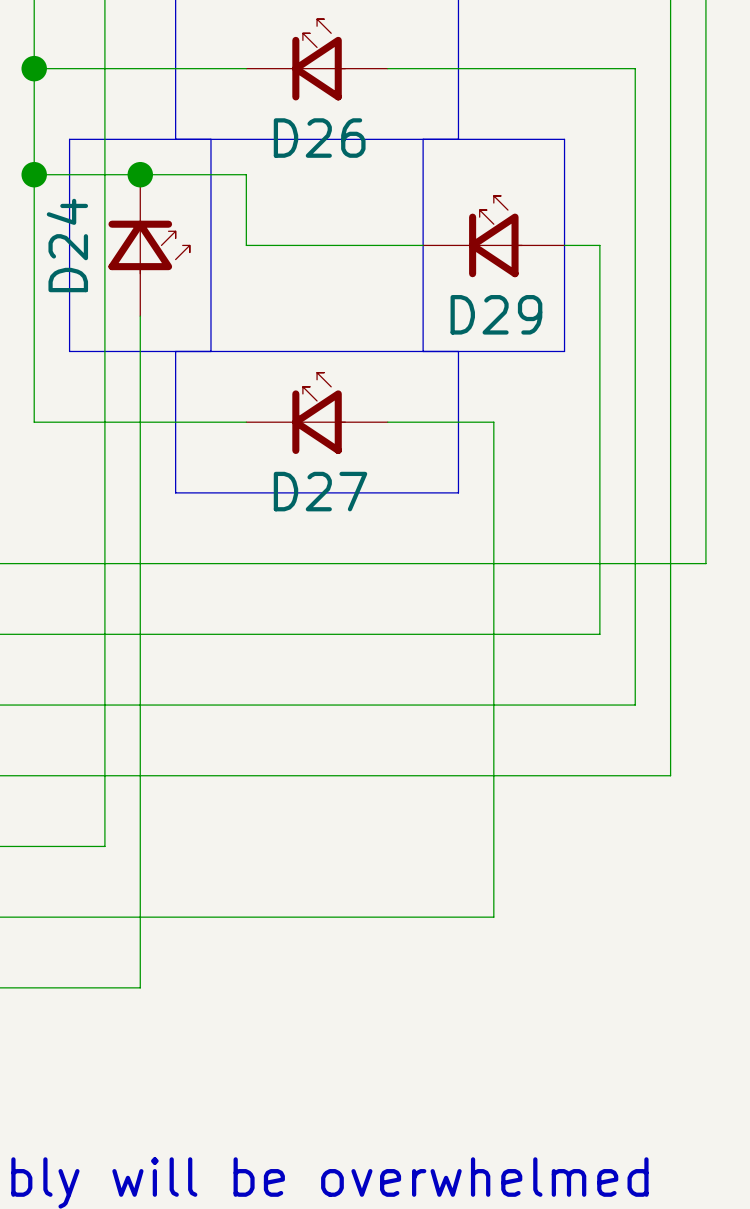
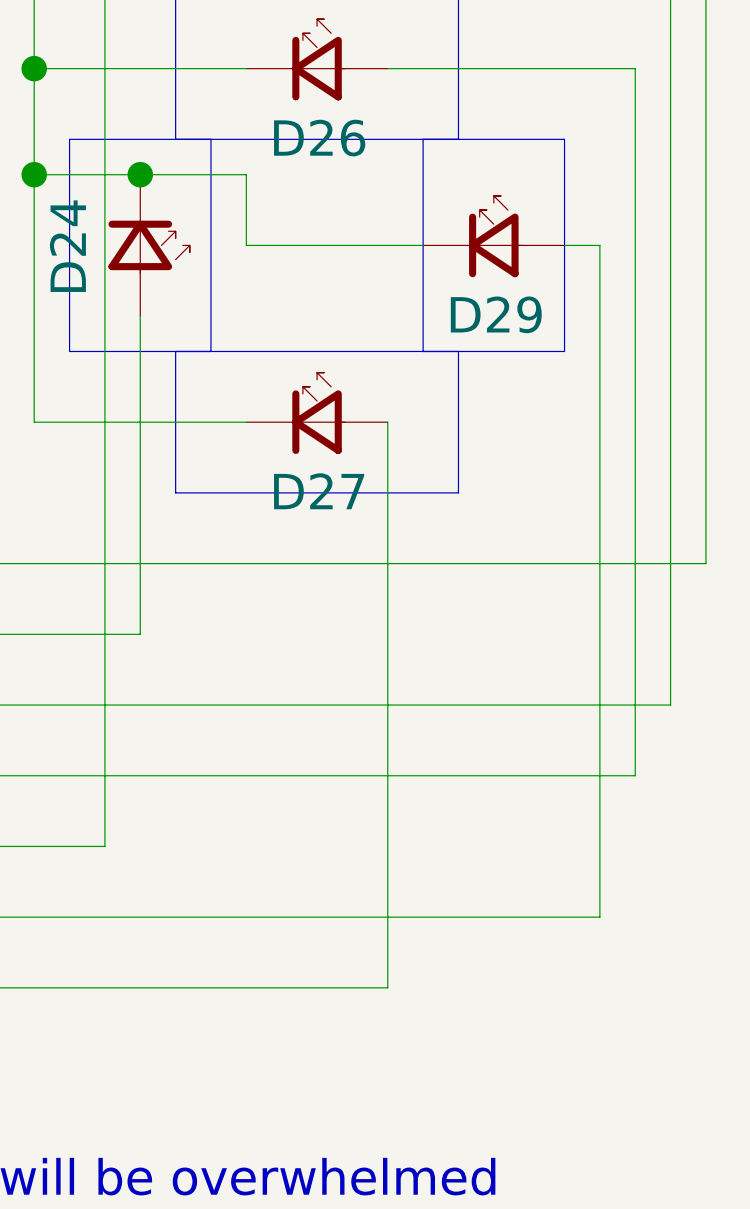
wire: (387, 422) (493, 422) (493, 917) -> (599, 634) (599, 917) (493, 917)
wire: (599, 634) (140, 634) (140, 987) -> (387, 422) (387, 987) (140, 987)
wire: (670, 705) (670, 775) (635, 775) -> (670, 705) (635, 705) (635, 775)

